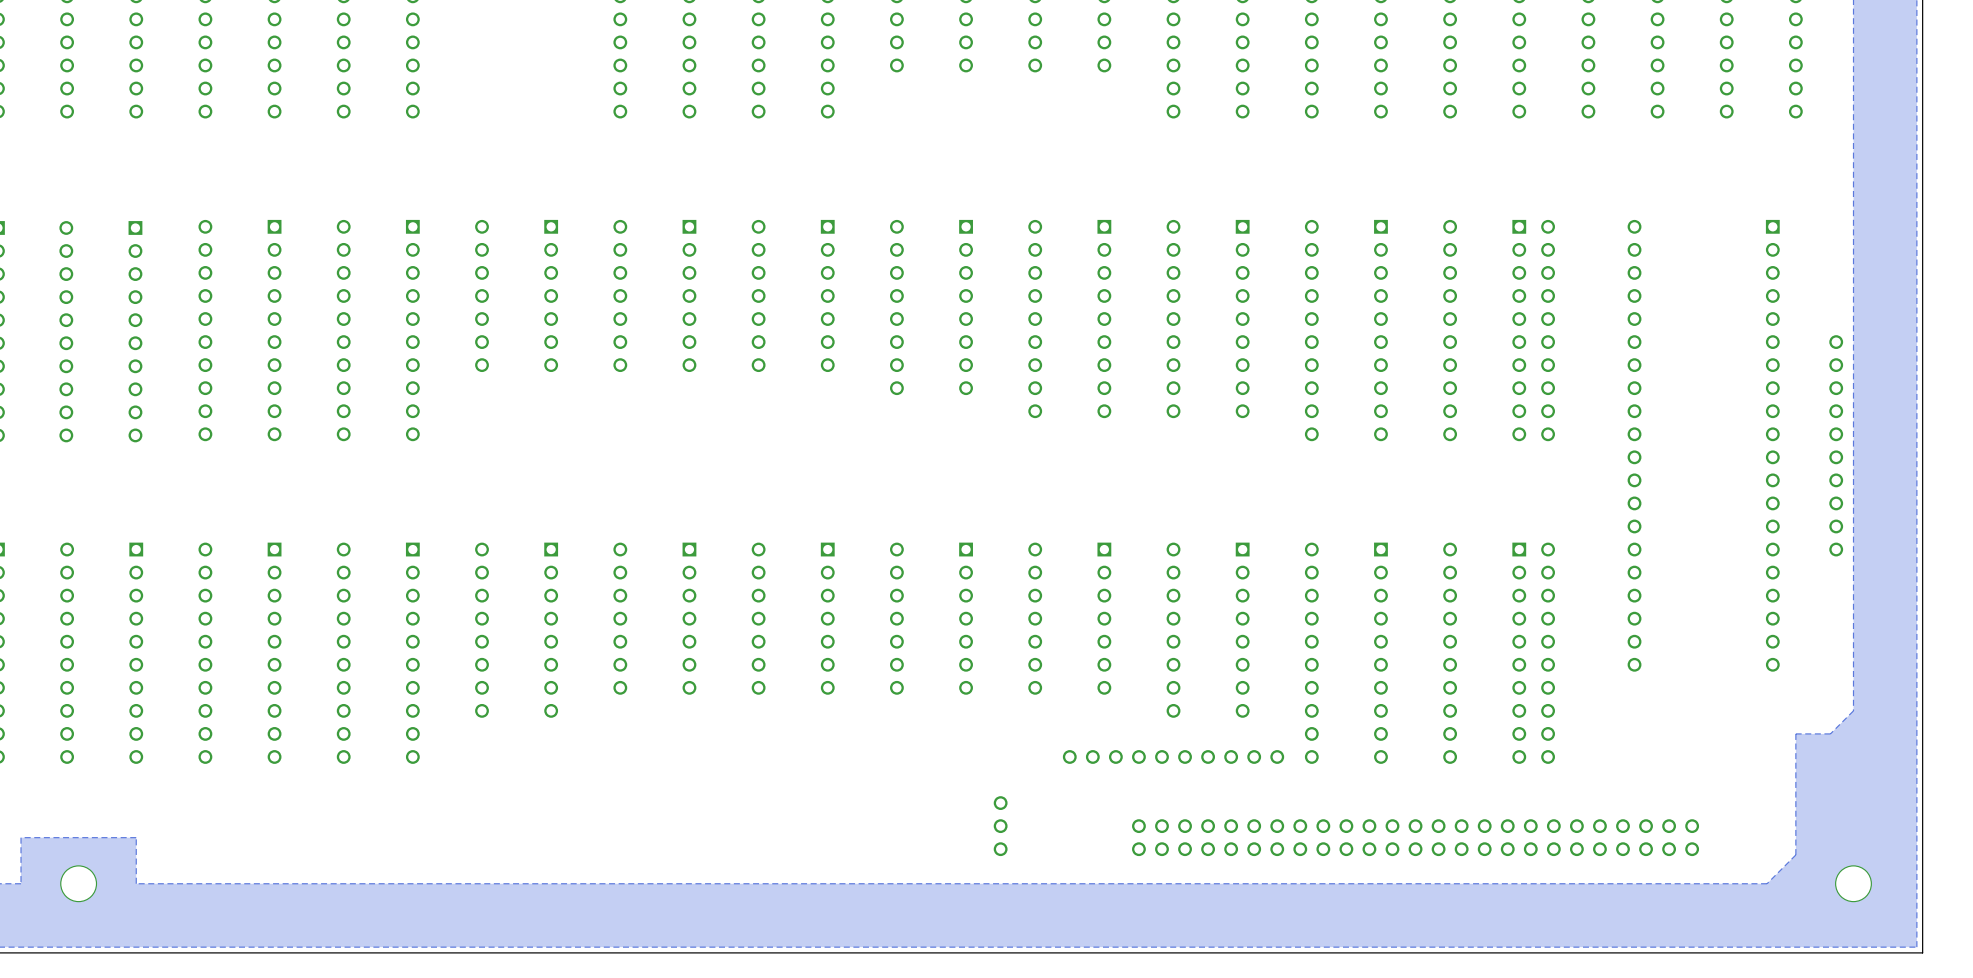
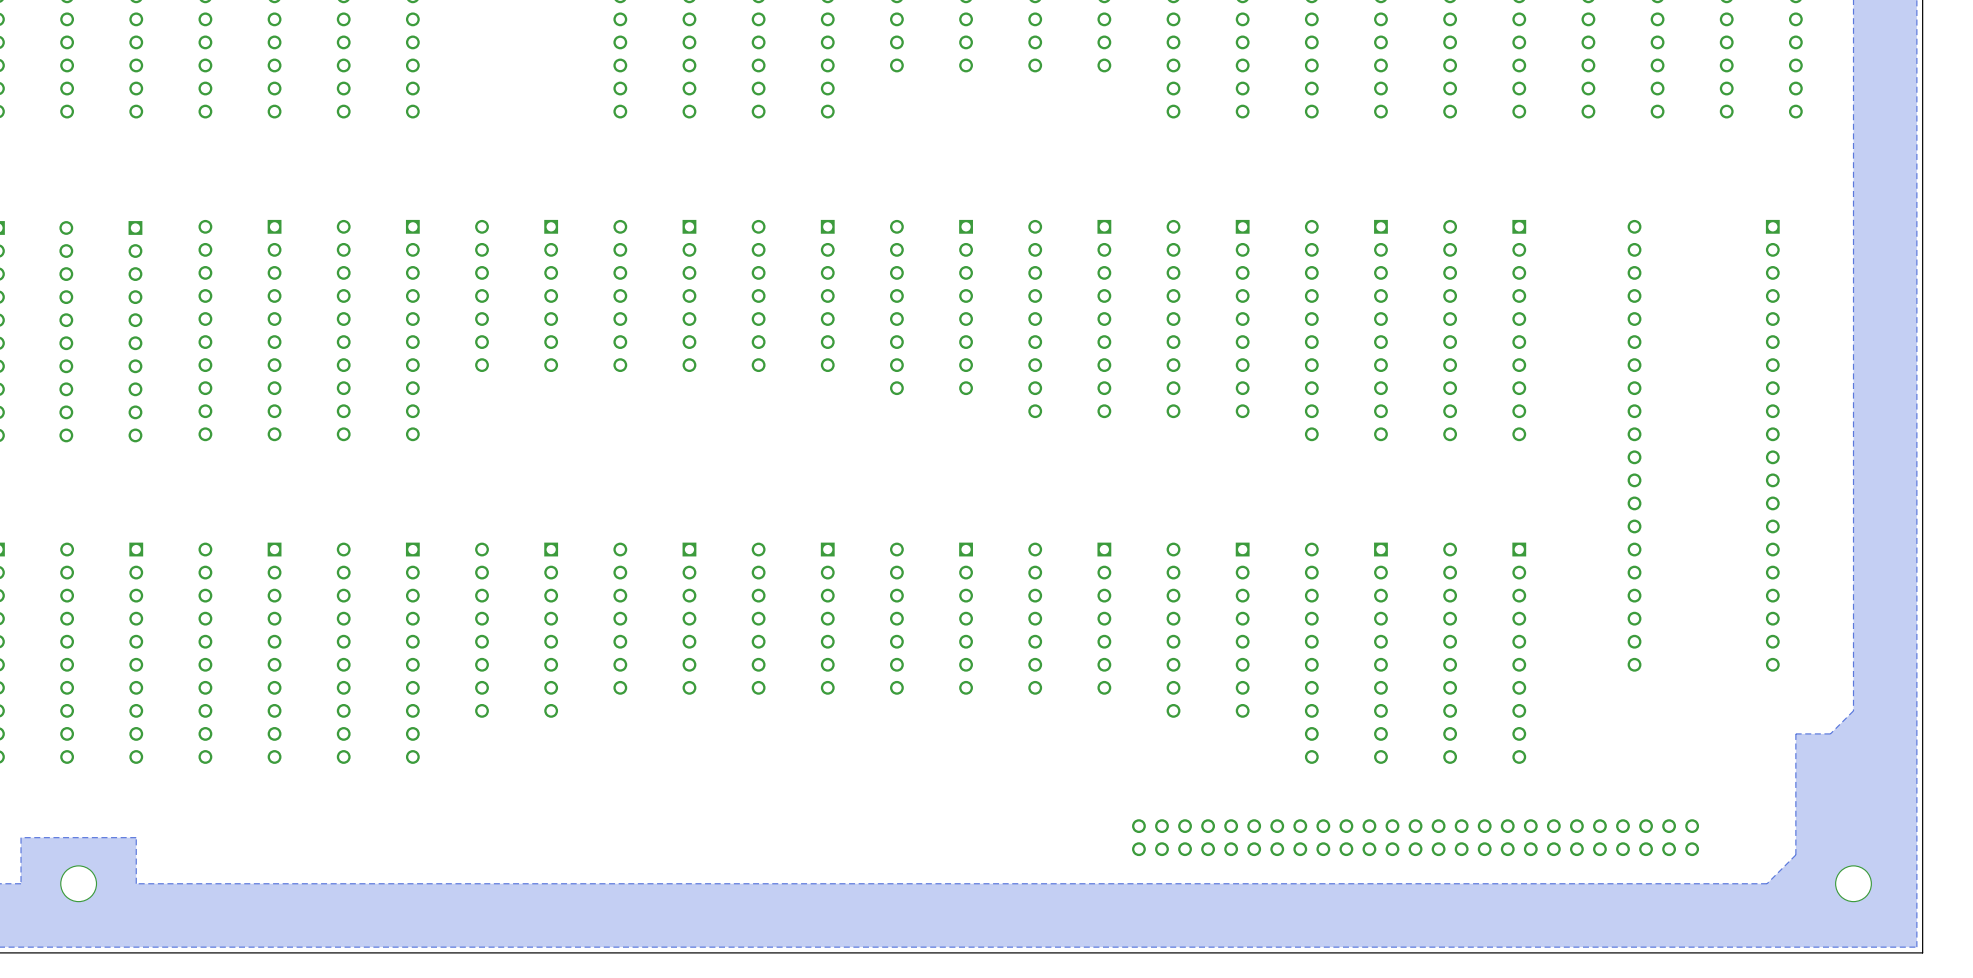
part: (1548, 330) -> none
part: (1836, 445) -> none
part: (1548, 653) -> none
part: (1173, 756) -> none
part: (1000, 826) -> none

